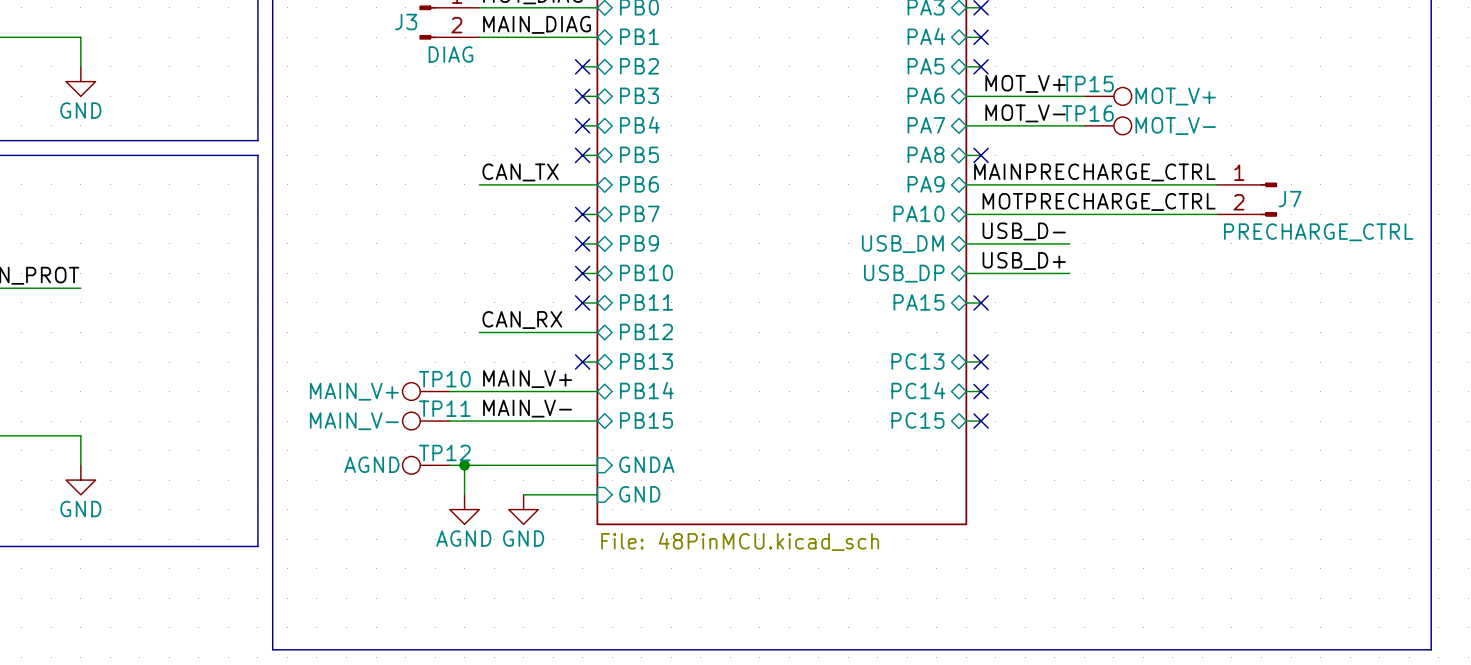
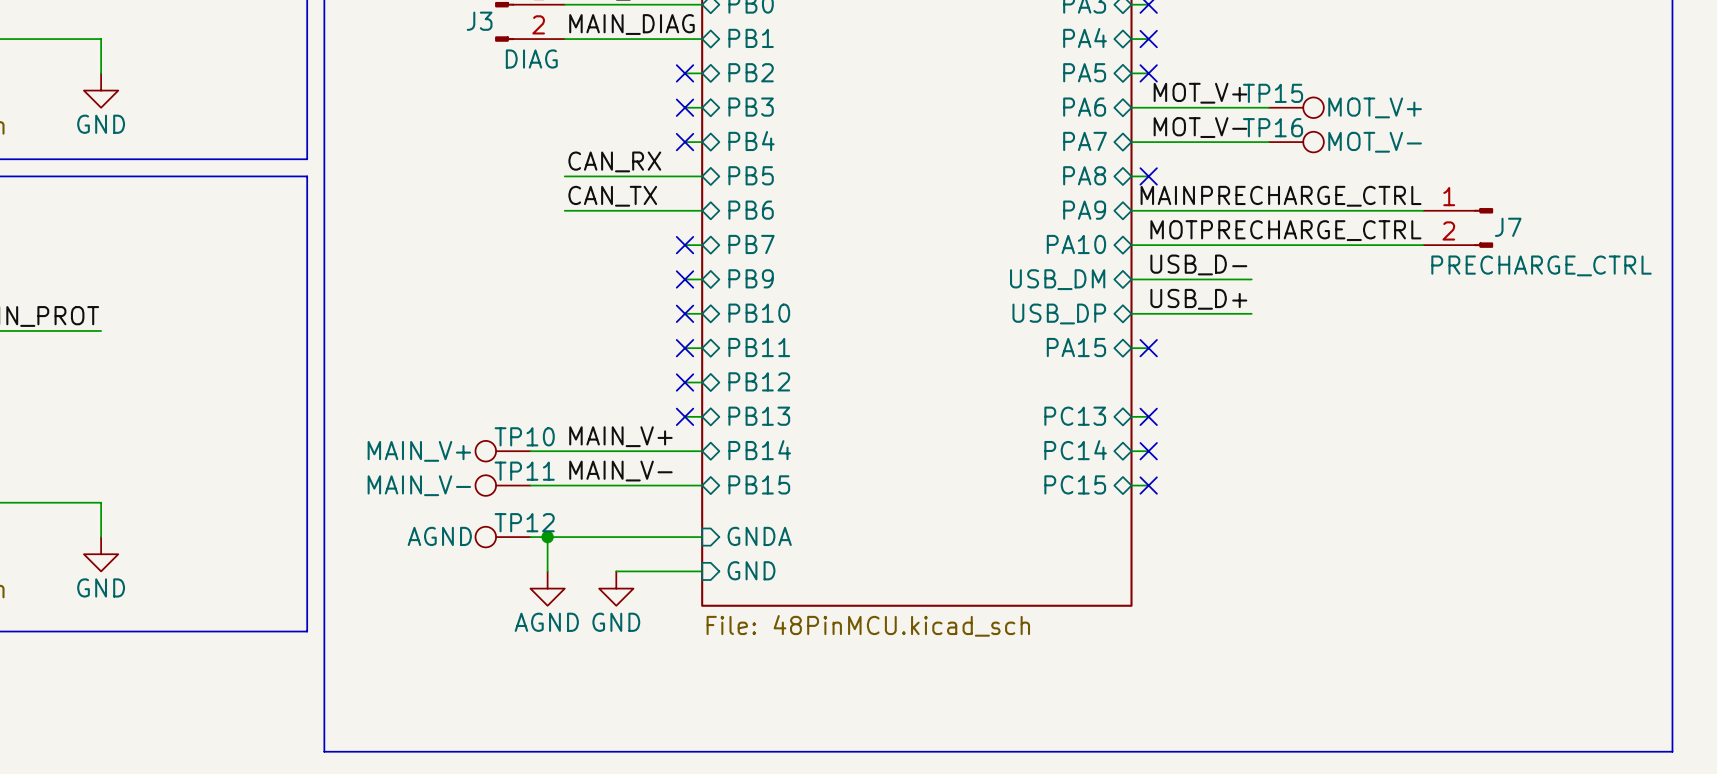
no-connect mark: (582, 155) -> none
label position: CAN_RX (522, 320) -> CAN_RX (614, 161)
wire: (479, 332) (582, 332) -> (564, 176) (685, 176)
no-connect mark: none -> (685, 382)

